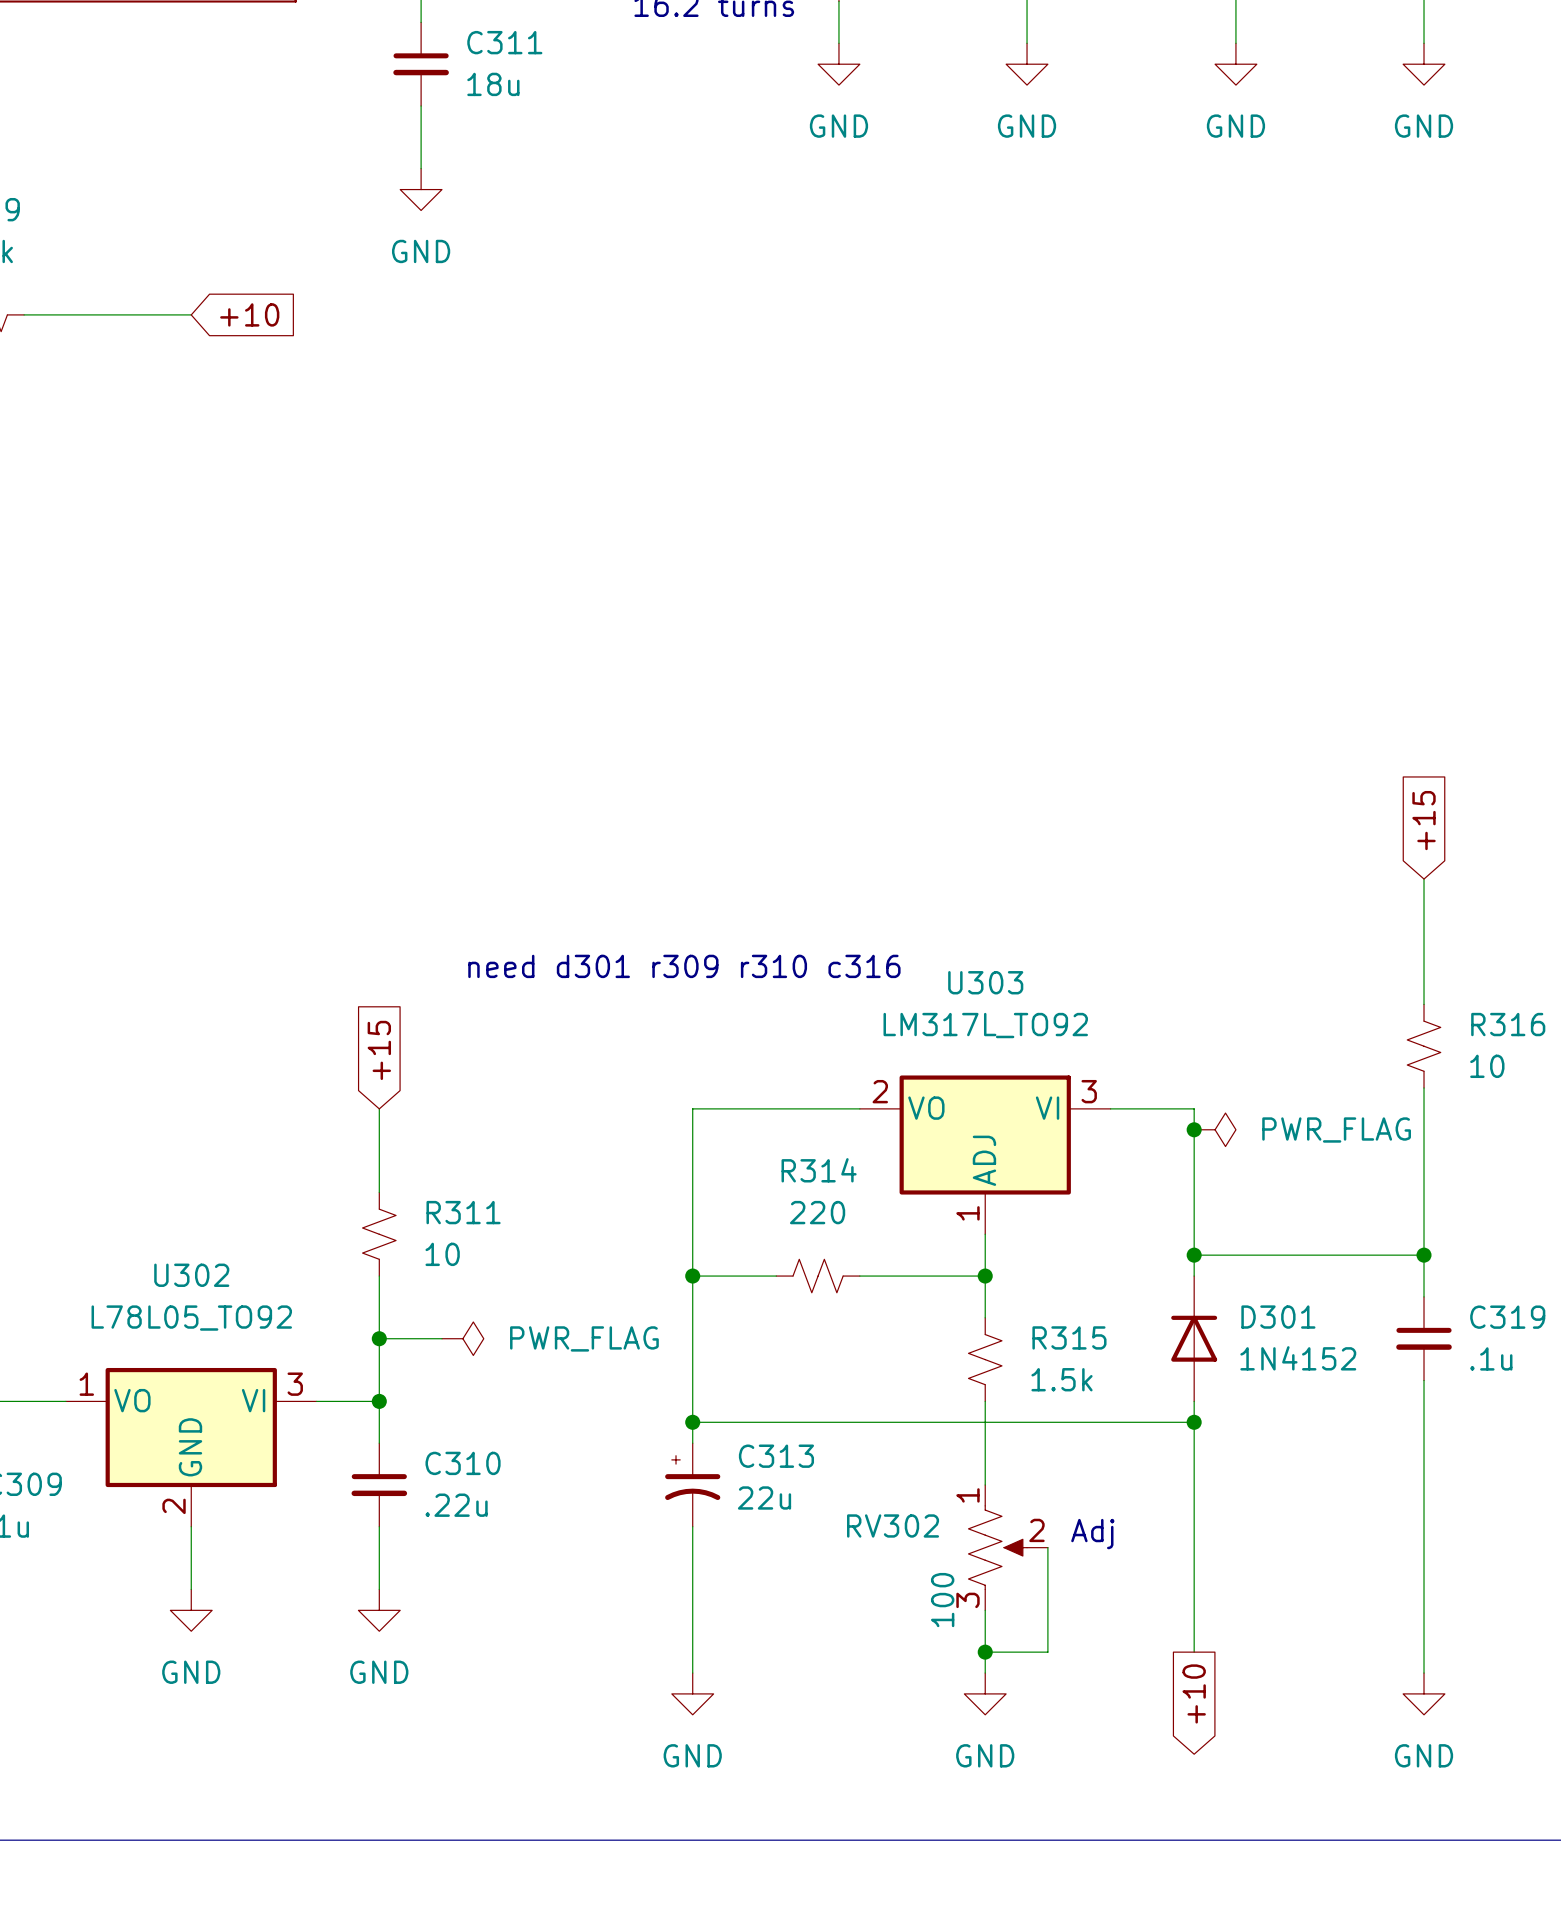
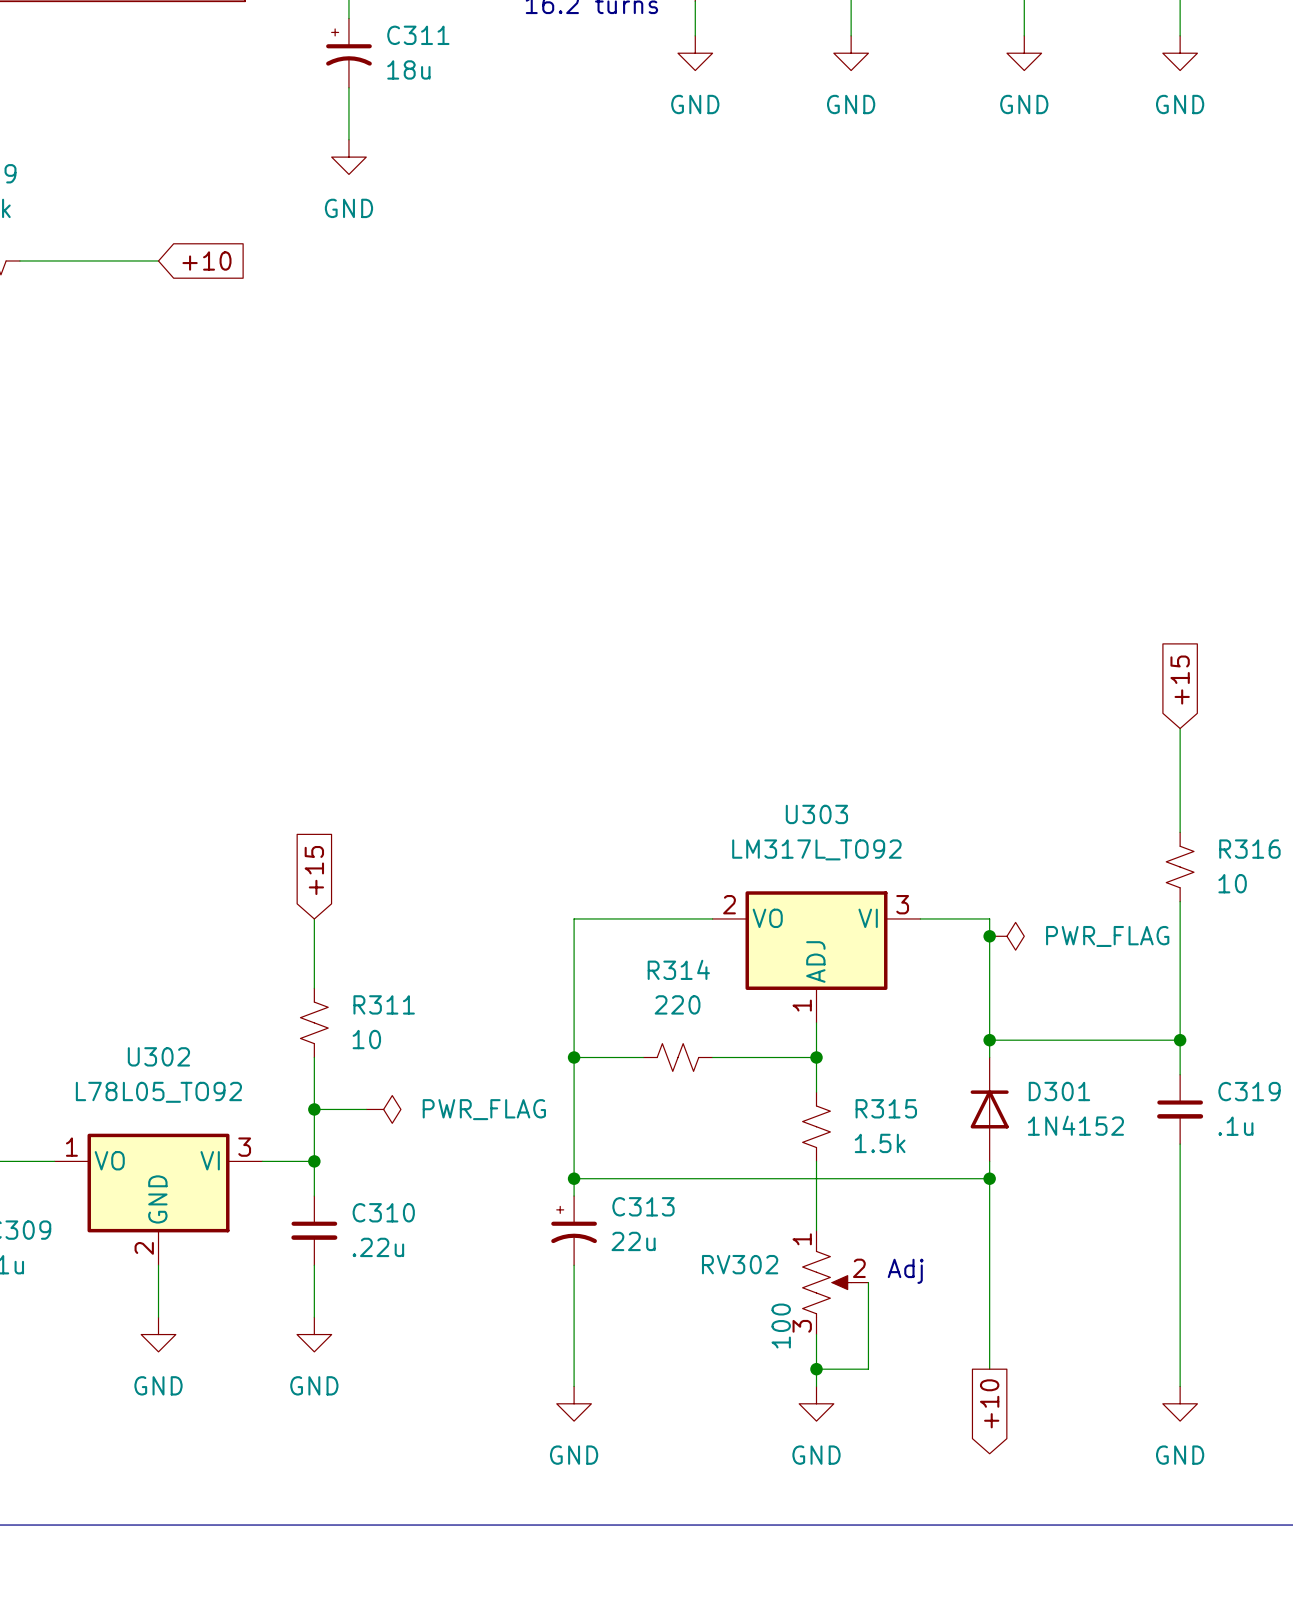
C311 symbol: [393, 22, 449, 106] -> [326, 18, 372, 88]
text: need d301 r309 r310 c316 (684, 966) -> none

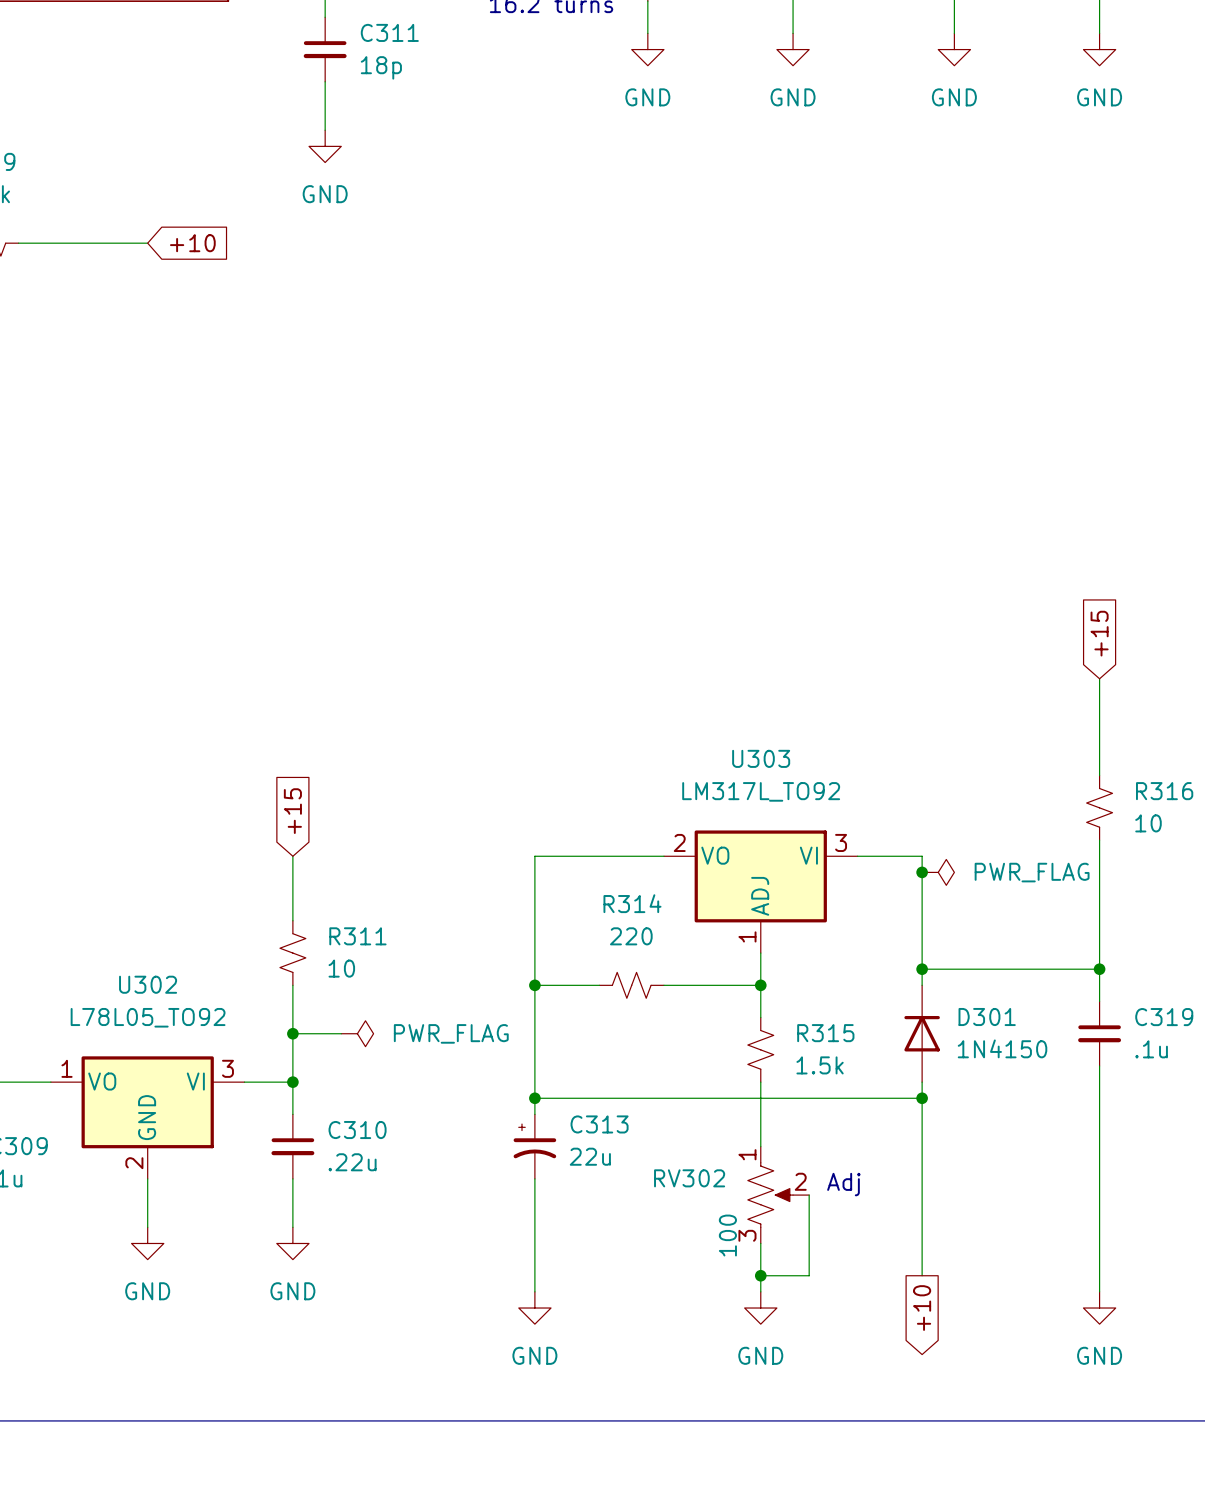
C311 symbol: [326, 18, 372, 88] -> [303, 17, 347, 82]
C311 value: 18u (408, 69) -> 18p (381, 67)
D301 value: 1N4152 (1075, 1125) -> 1N4150 (1002, 1048)

